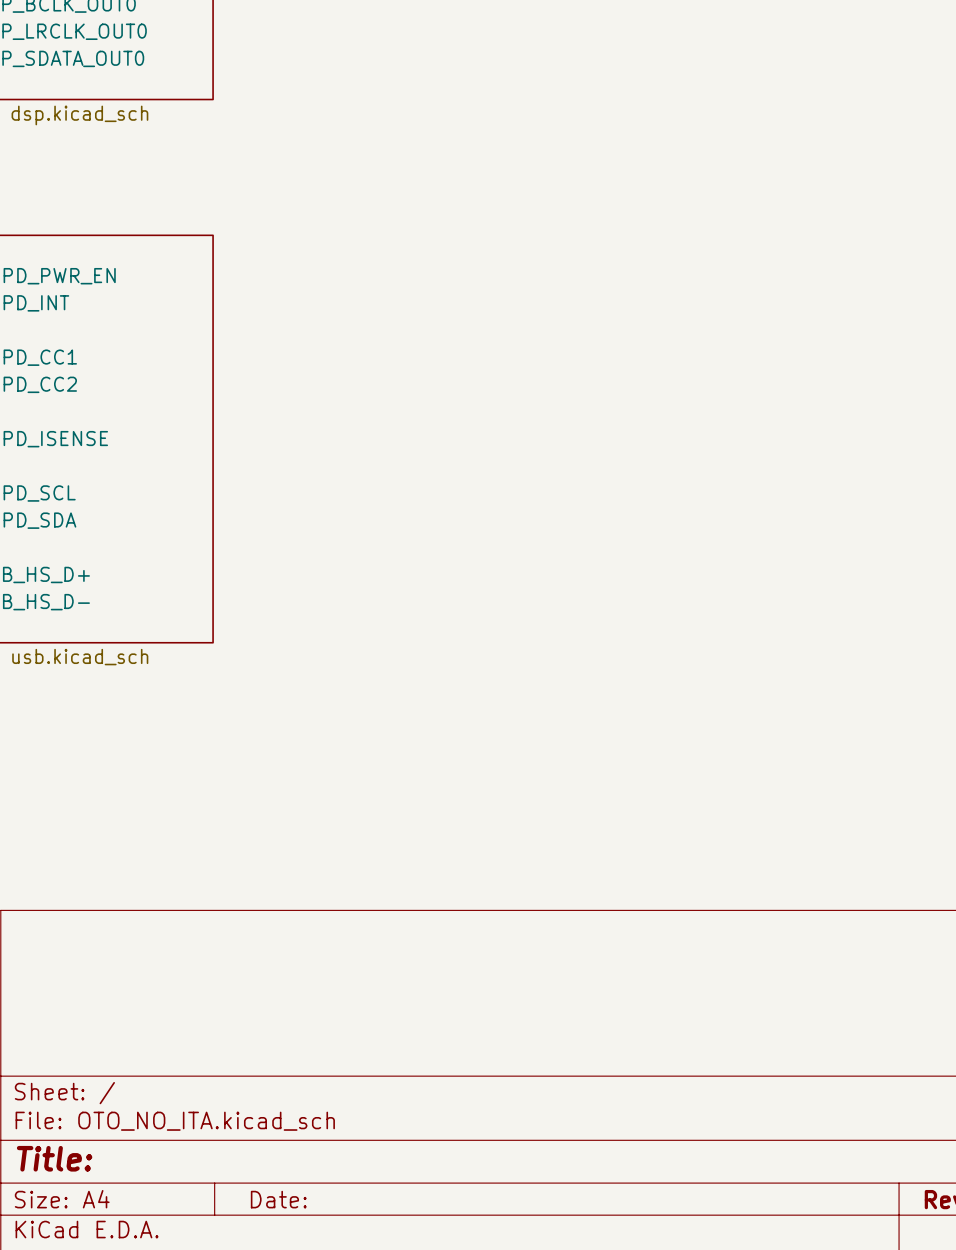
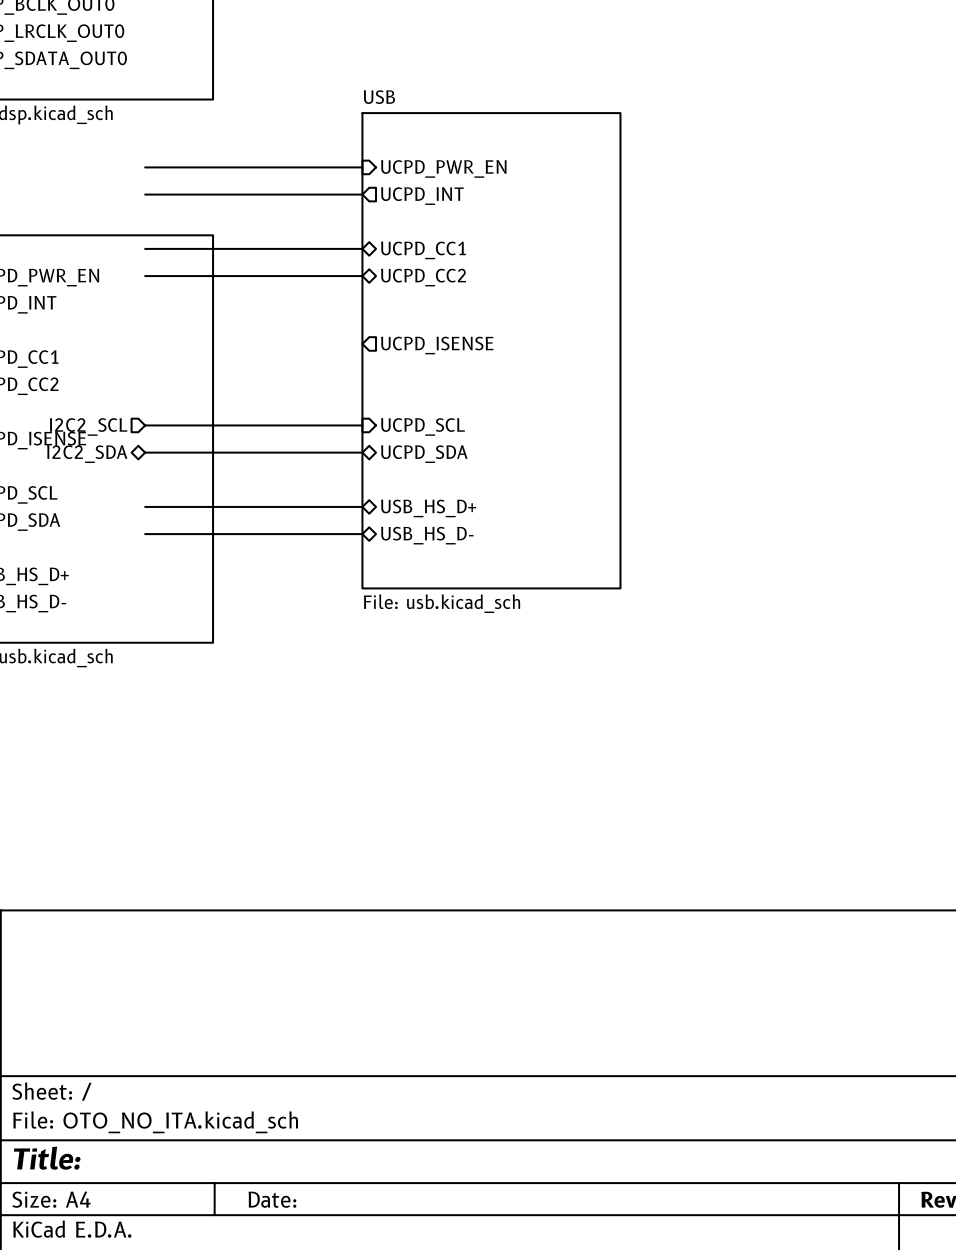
wire: none -> (145, 167) (362, 167)
sheet pin: none -> UCPD_PWR_EN (443, 168)
wire: none -> (145, 194) (362, 194)
sheet pin: none -> UCPD_INT (422, 196)
wire: none -> (145, 248) (362, 248)
sheet pin: none -> UCPD_CC1 (423, 250)
wire: none -> (145, 276) (362, 276)
sheet pin: none -> UCPD_CC2 (423, 277)
sheet pin: none -> UCPD_ISENSE (437, 345)
sheet USB: none -> File: usb.kicad_sch (491, 350)
sheet pin: none -> I2C2_SCL (88, 426)
wire: none -> (145, 425) (362, 425)
sheet pin: none -> UCPD_SCL (422, 426)
sheet pin: none -> I2C2_SDA (87, 454)
wire: none -> (145, 452) (362, 452)
sheet pin: none -> UCPD_SDA (424, 454)
wire: none -> (145, 506) (362, 506)
sheet pin: none -> USB_HS_D+ (428, 508)
wire: none -> (145, 534) (362, 534)
sheet pin: none -> USB_HS_D- (427, 535)

